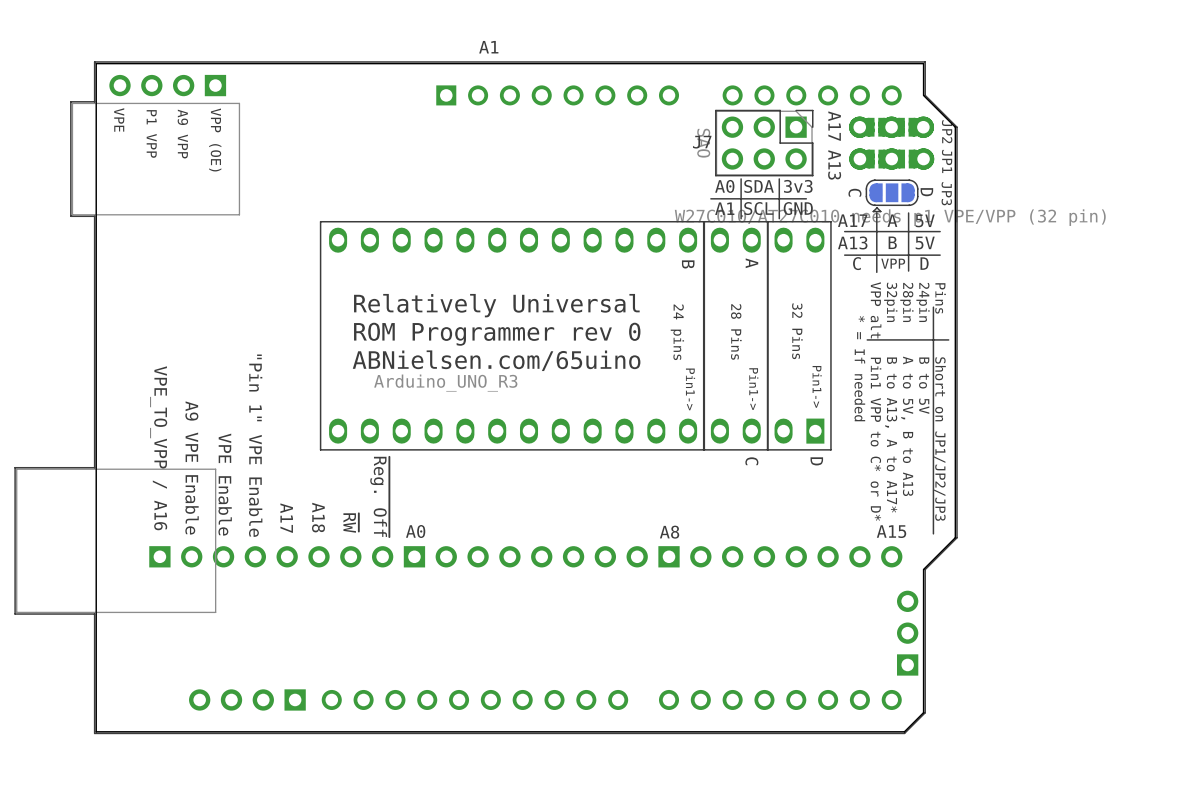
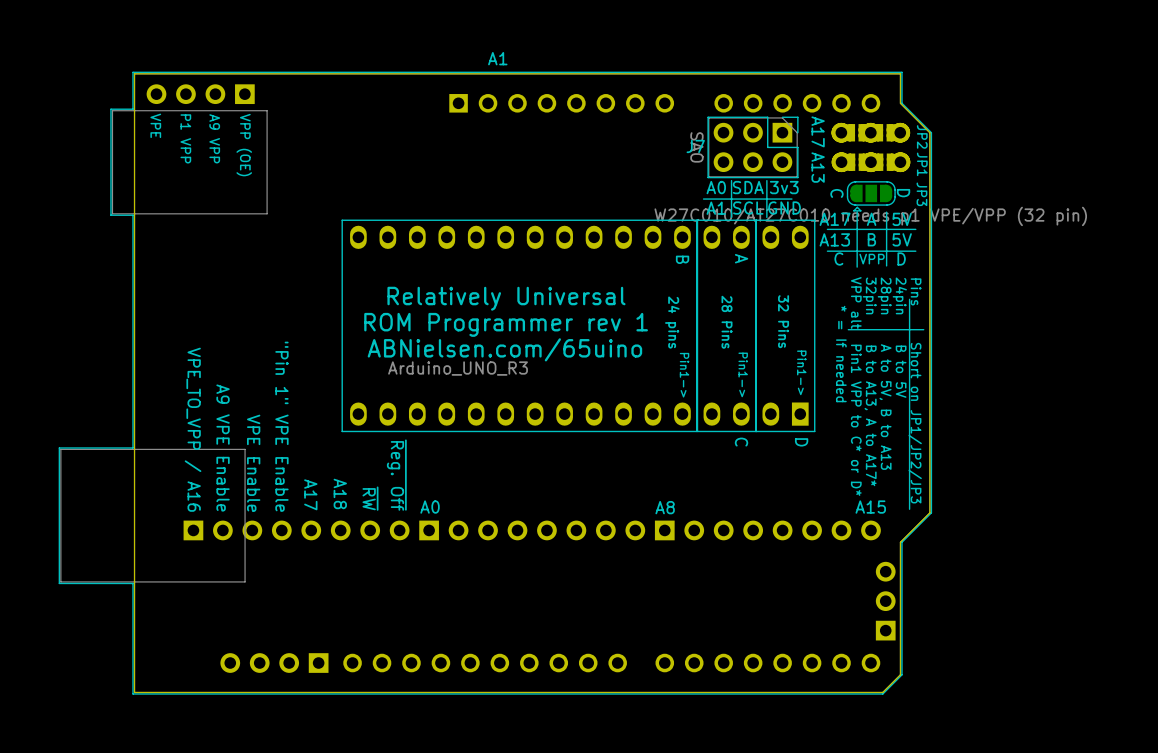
text: ROM Programmer rev 0 (497, 334) -> ROM Programmer rev 1 (506, 324)

